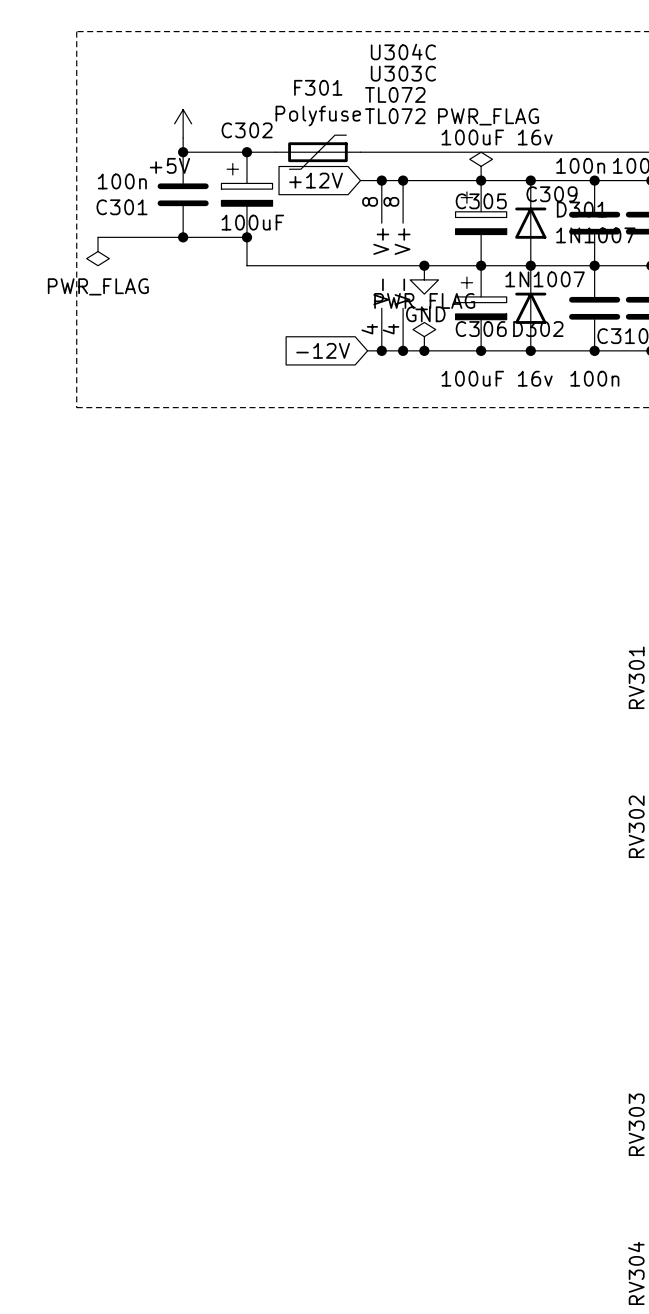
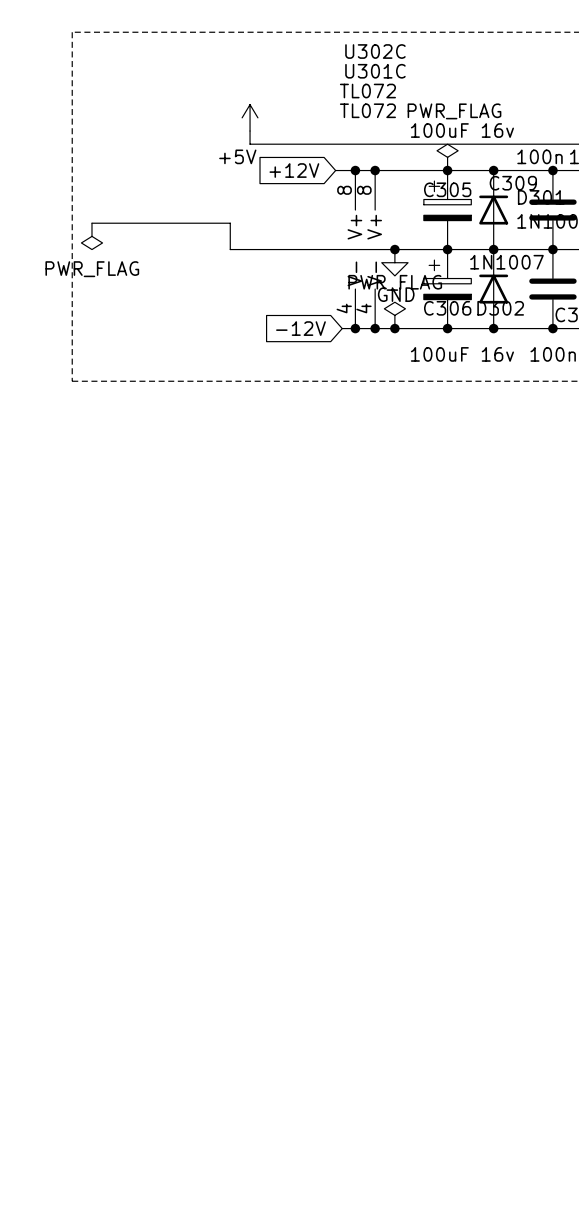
U304C name: U304C (403, 52) -> U302C (375, 51)
U303C name: U303C (403, 73) -> U301C (375, 71)
power symbol position: +5V (183, 123) -> +5V (250, 117)
wire: (183, 138) (183, 152) (268, 152) -> (250, 131) (250, 144)
junction: (183, 152) -> none
junction: (246, 152) -> none
F301: Polyfuse (317, 152) -> none
C301: 100n (183, 194) -> none
C302: 100uF (246, 194) -> none
junction: (183, 237) -> none
junction: (246, 237) -> none

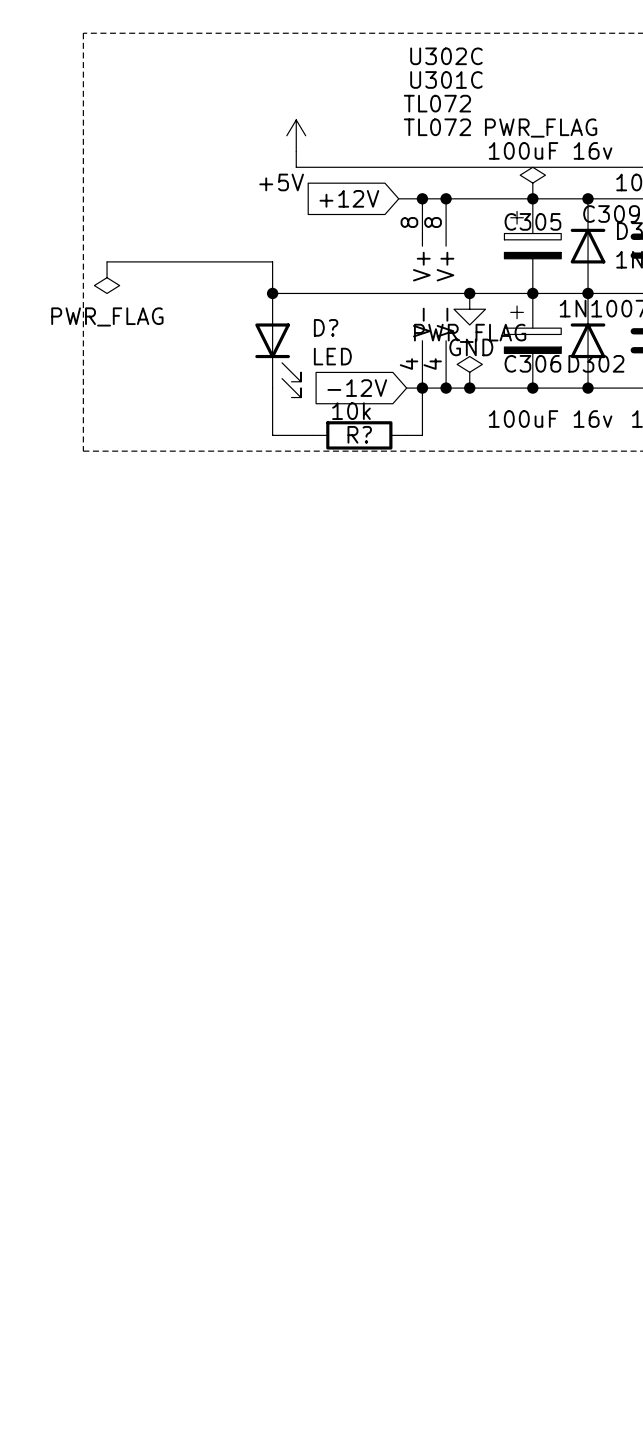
junction: none -> (272, 293)
D?: none -> LED (278, 345)
wire: none -> (272, 388) (272, 435) (312, 435)
wire: none -> (422, 388) (422, 435) (406, 435)
R?: none -> 10k (359, 435)

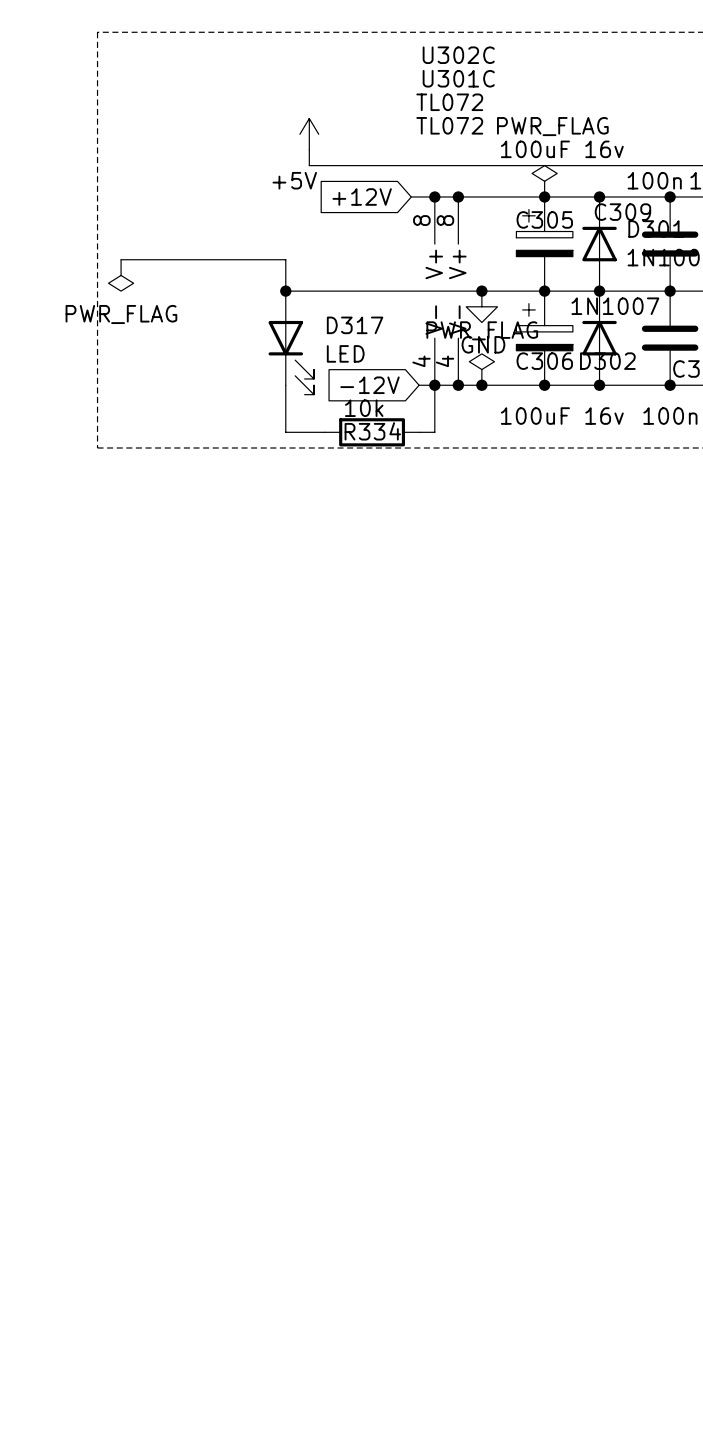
D? name: D? (326, 327) -> D317 (355, 325)
R? name: R? (359, 434) -> R334 (372, 431)

